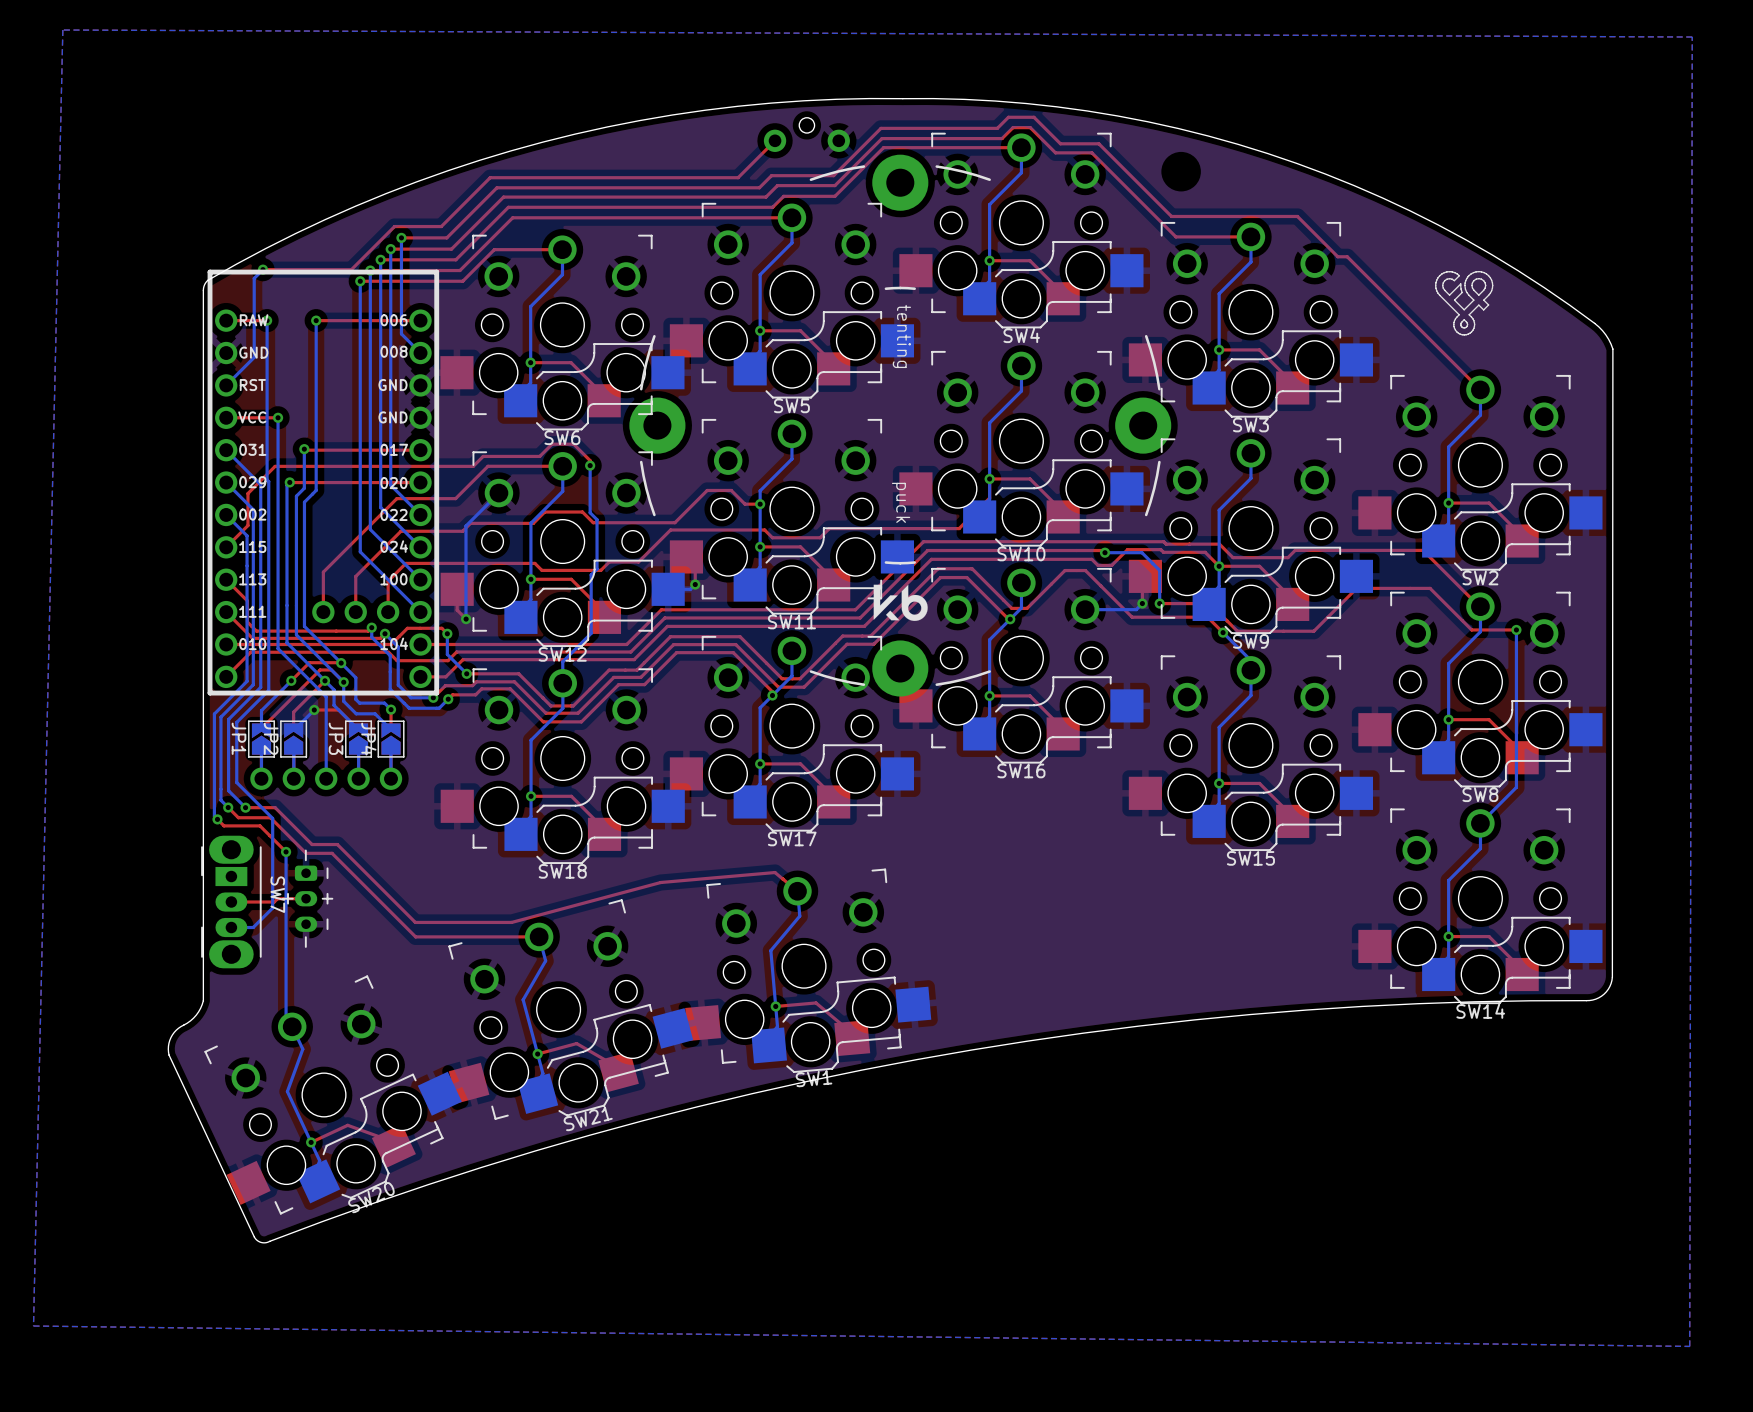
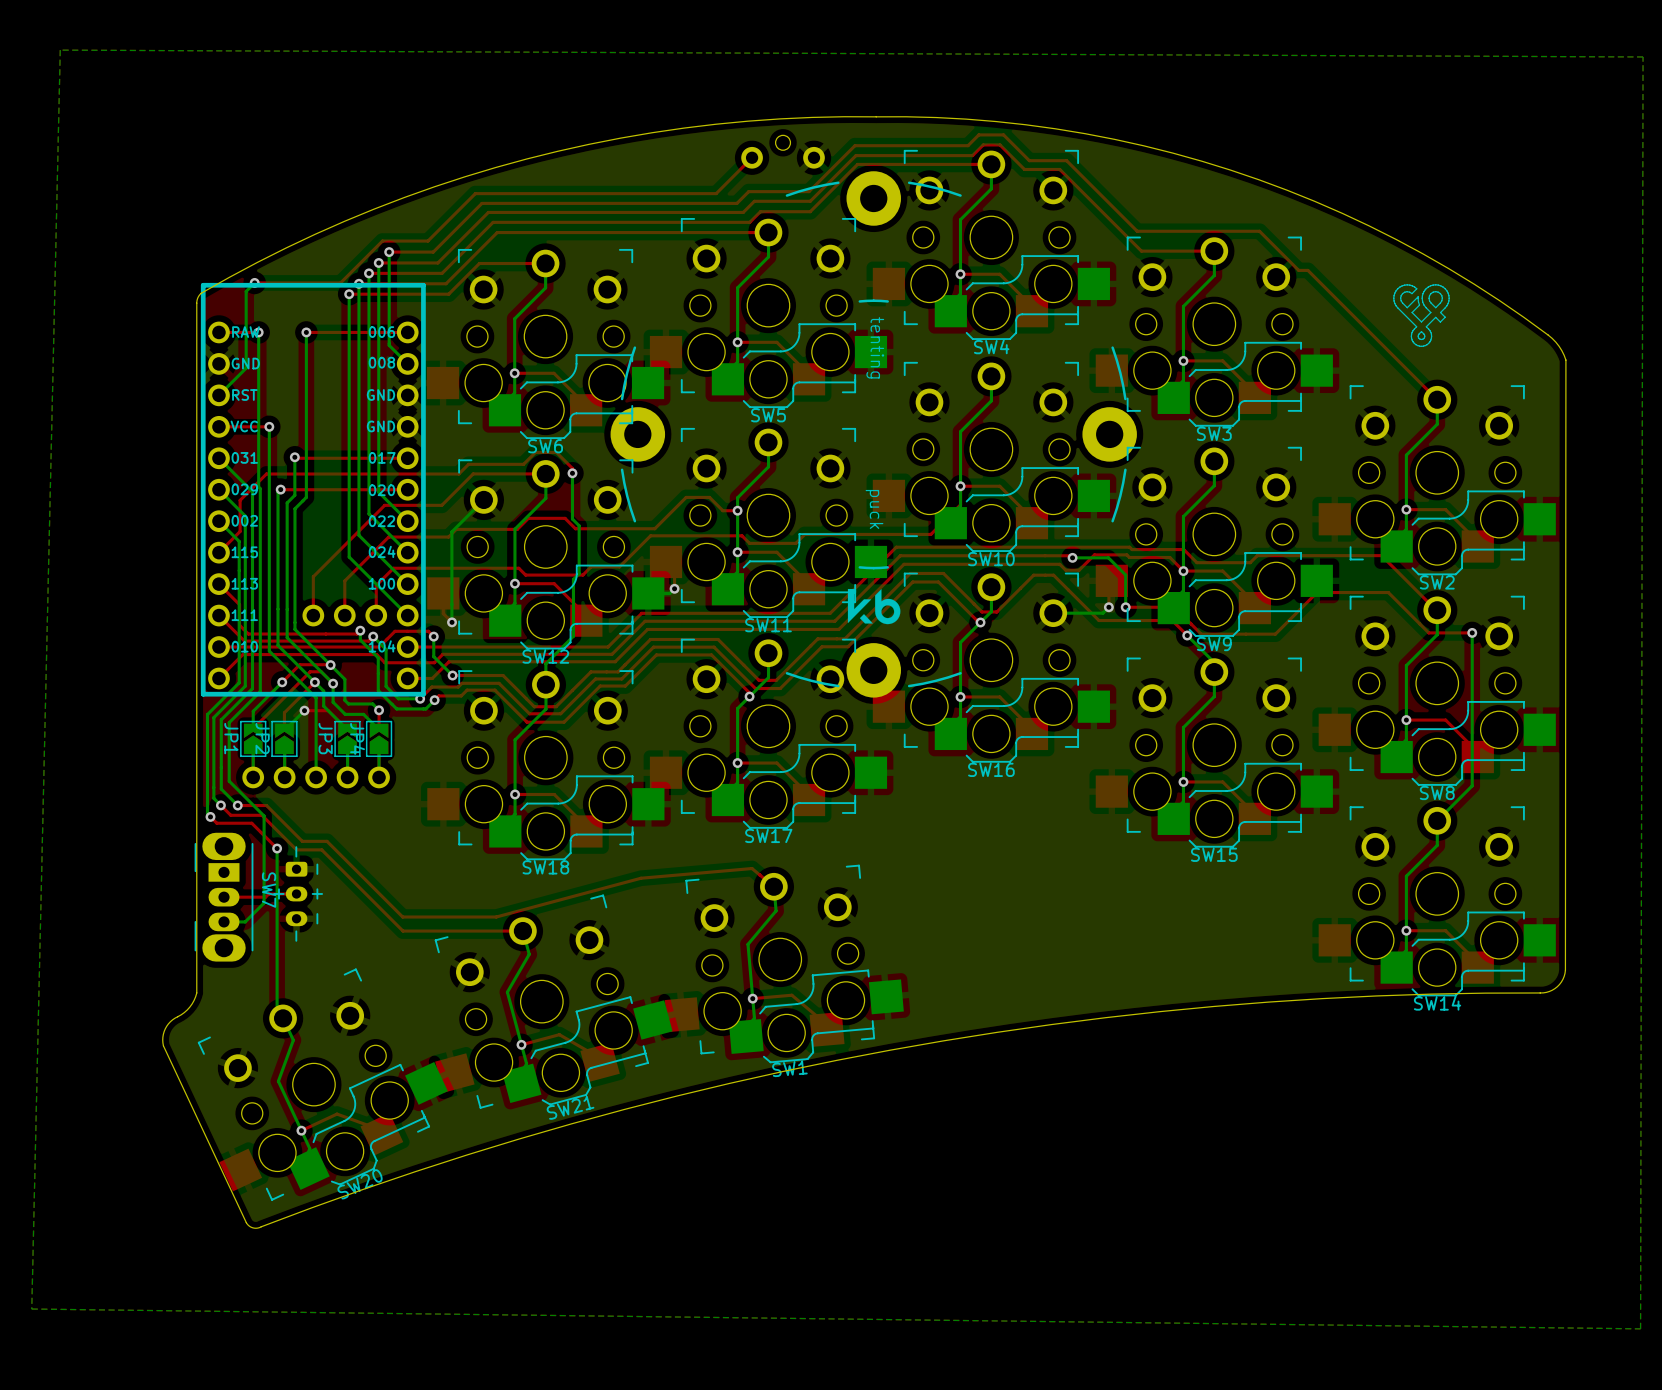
via: (1181, 171) -> none

